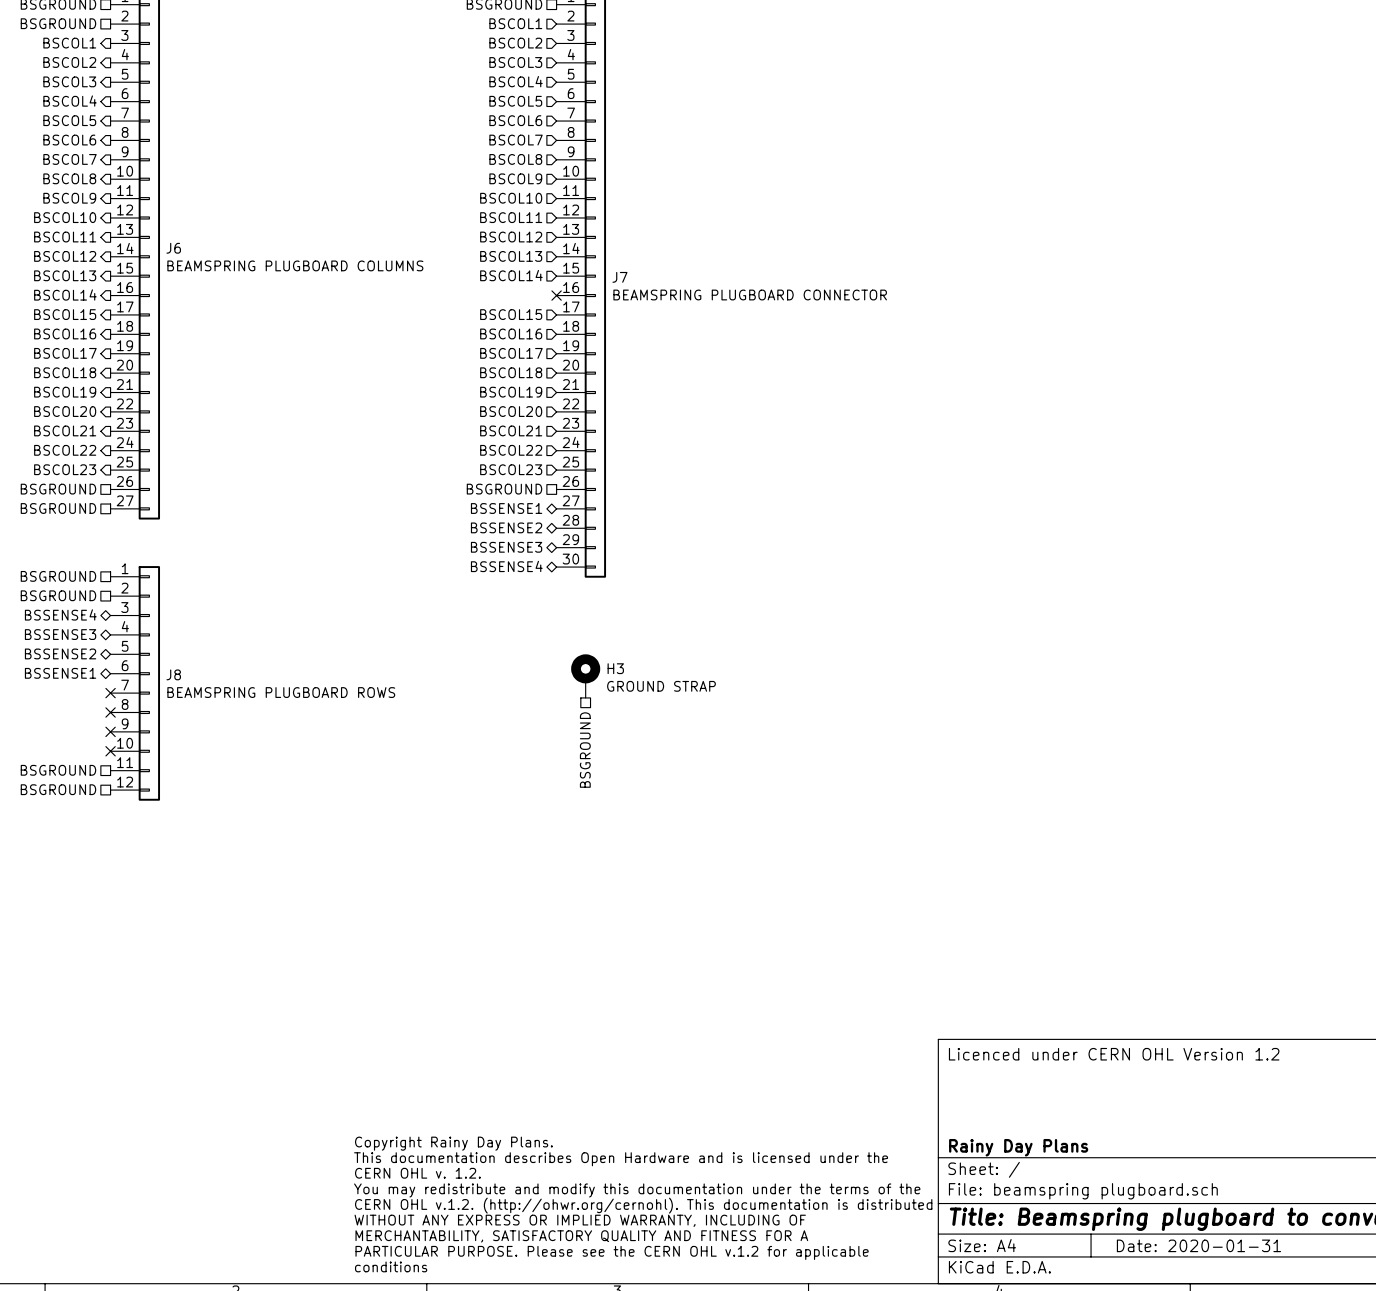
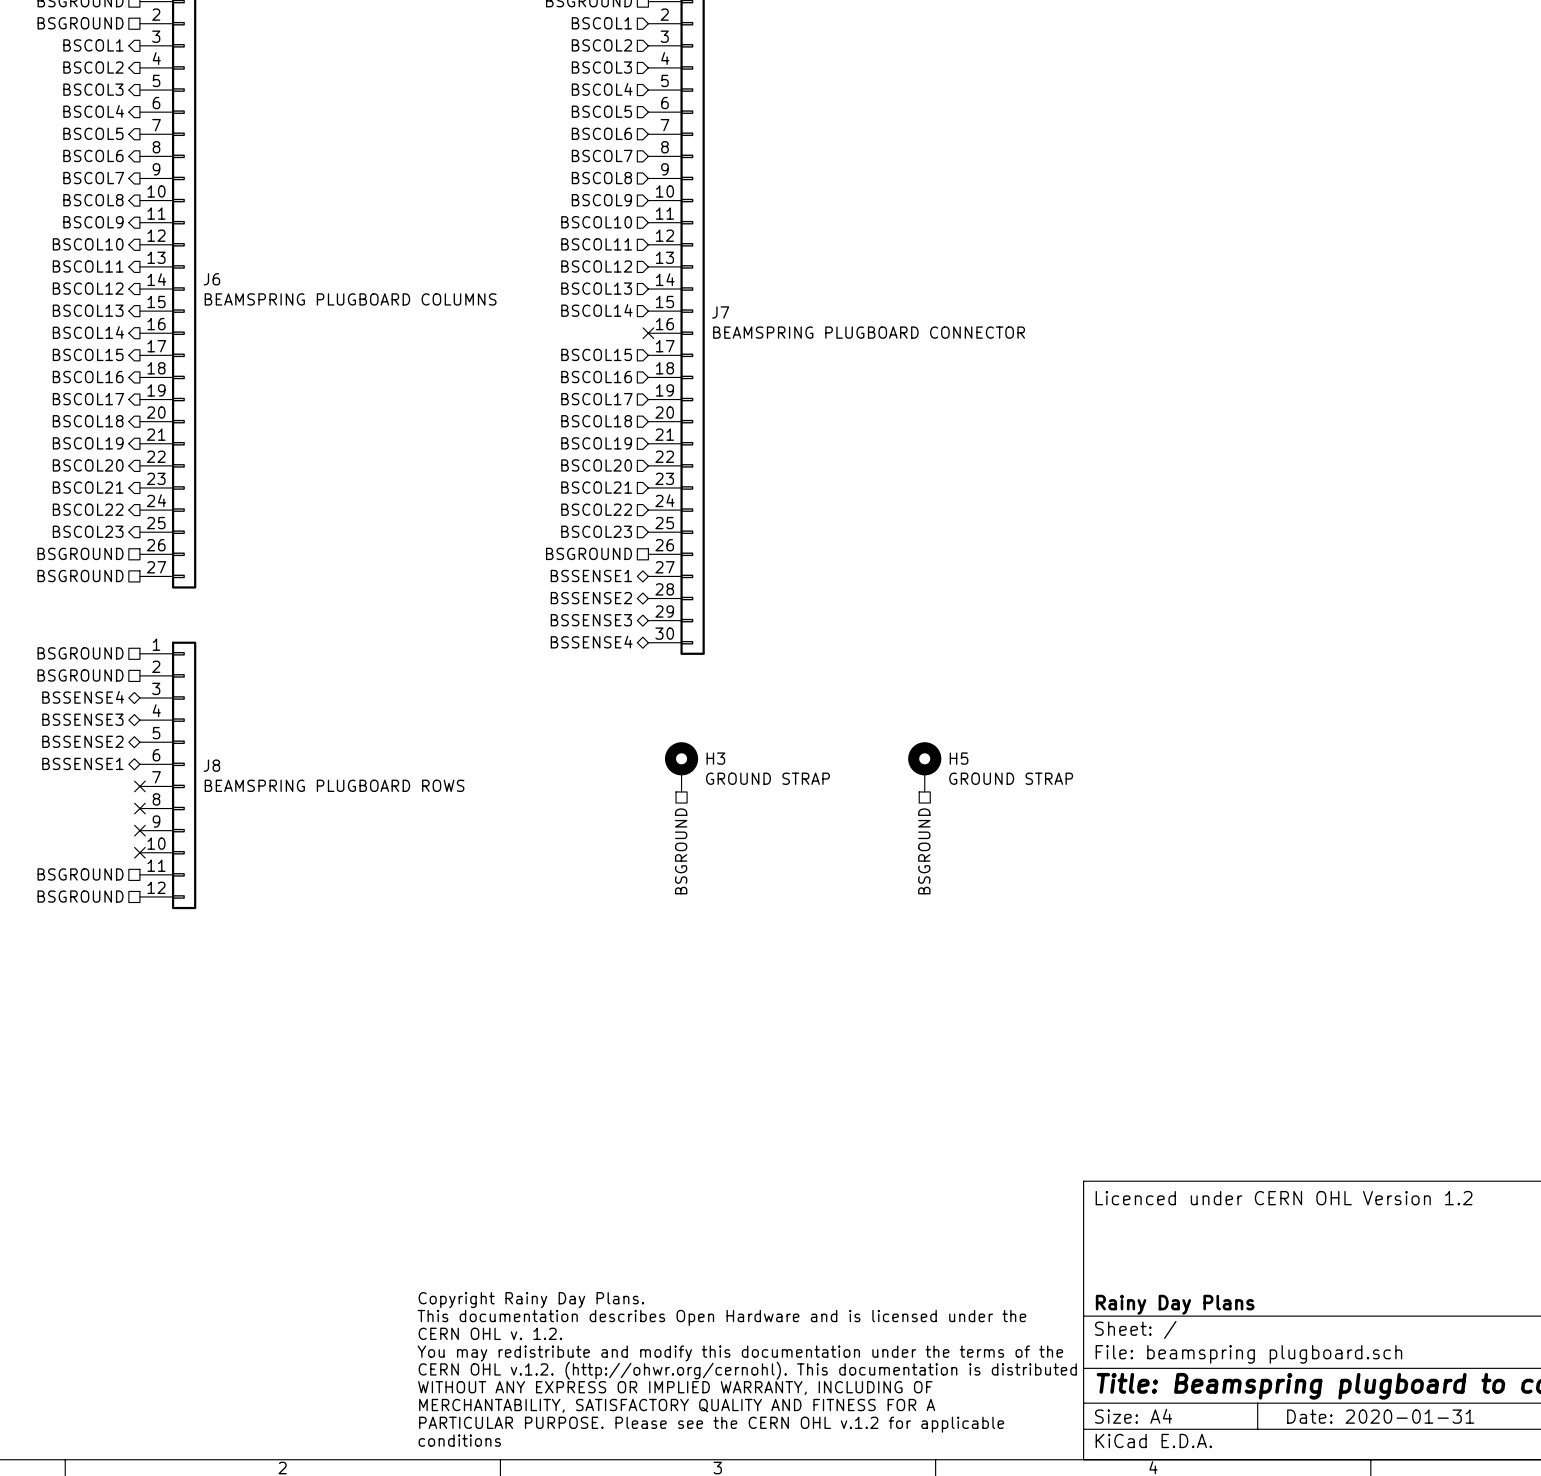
H5: none -> GROUND STRAP (924, 767)
hierarchical label: none -> BSGROUND (924, 851)

